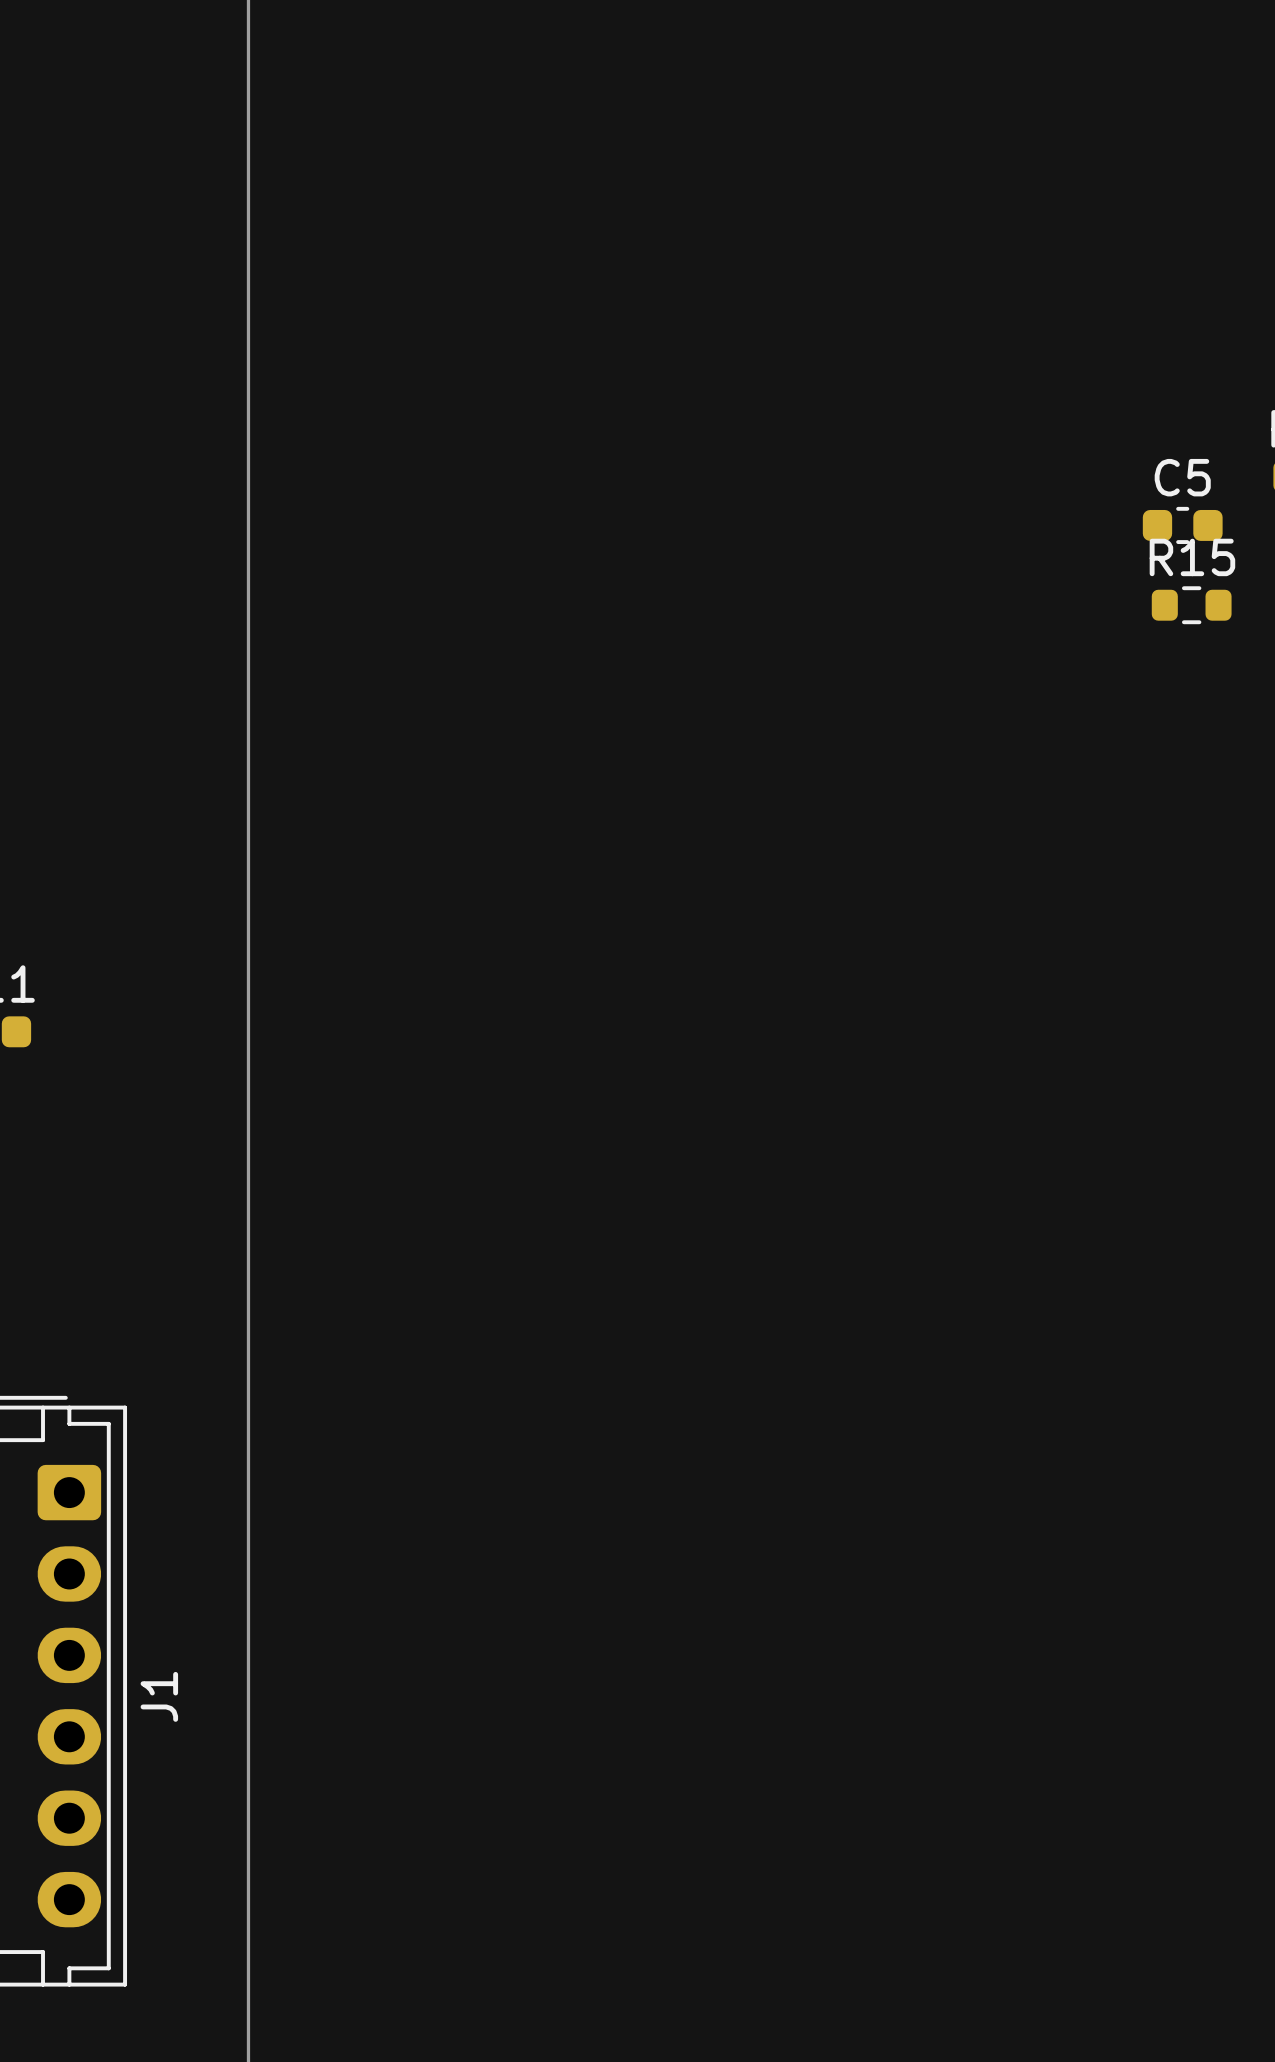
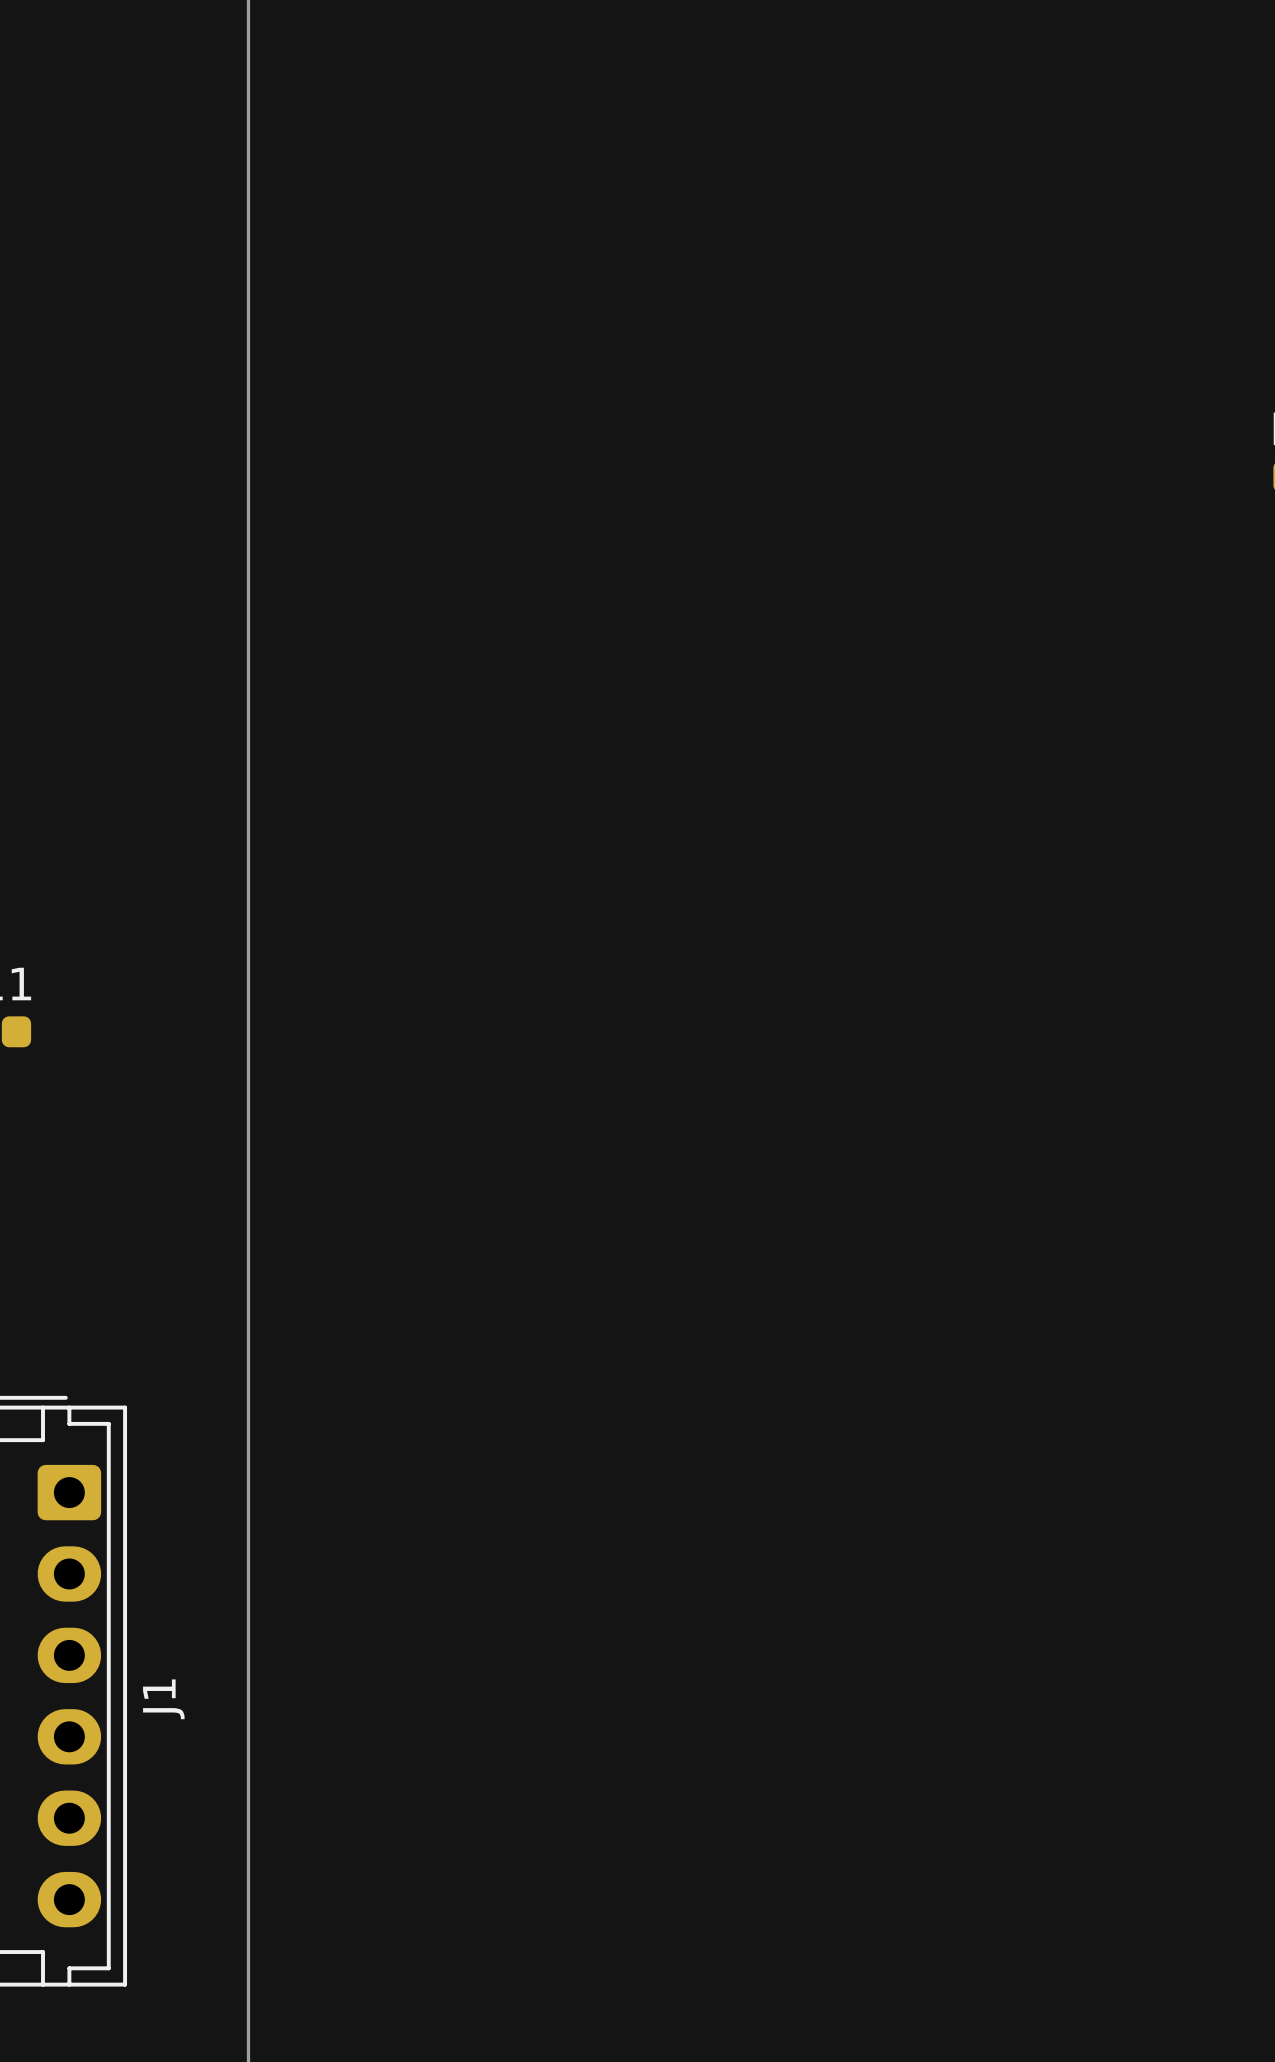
C5: (1182, 525) -> none
R15: (1191, 605) -> none

